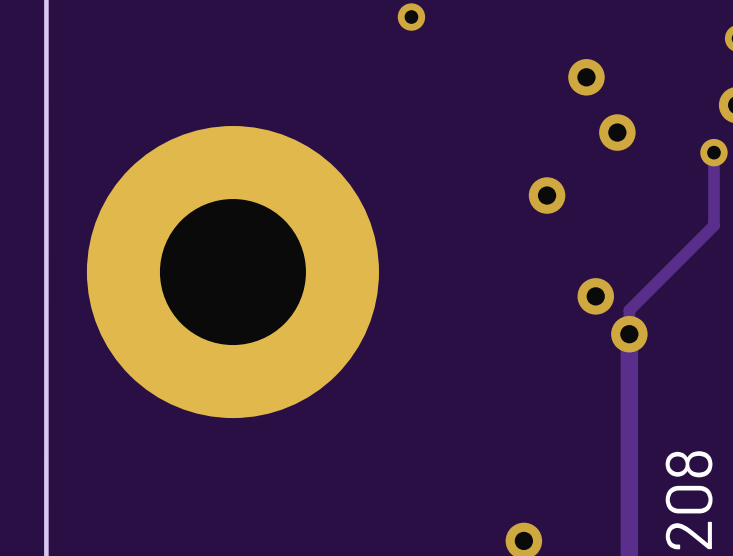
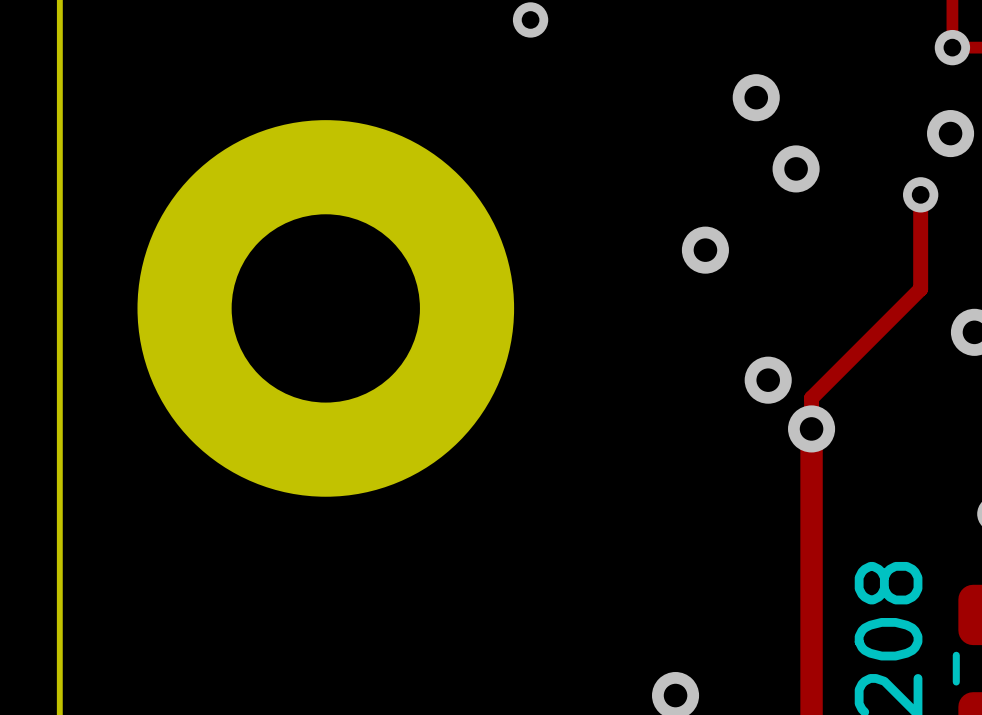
part position: (232, 272) -> (325, 308)

